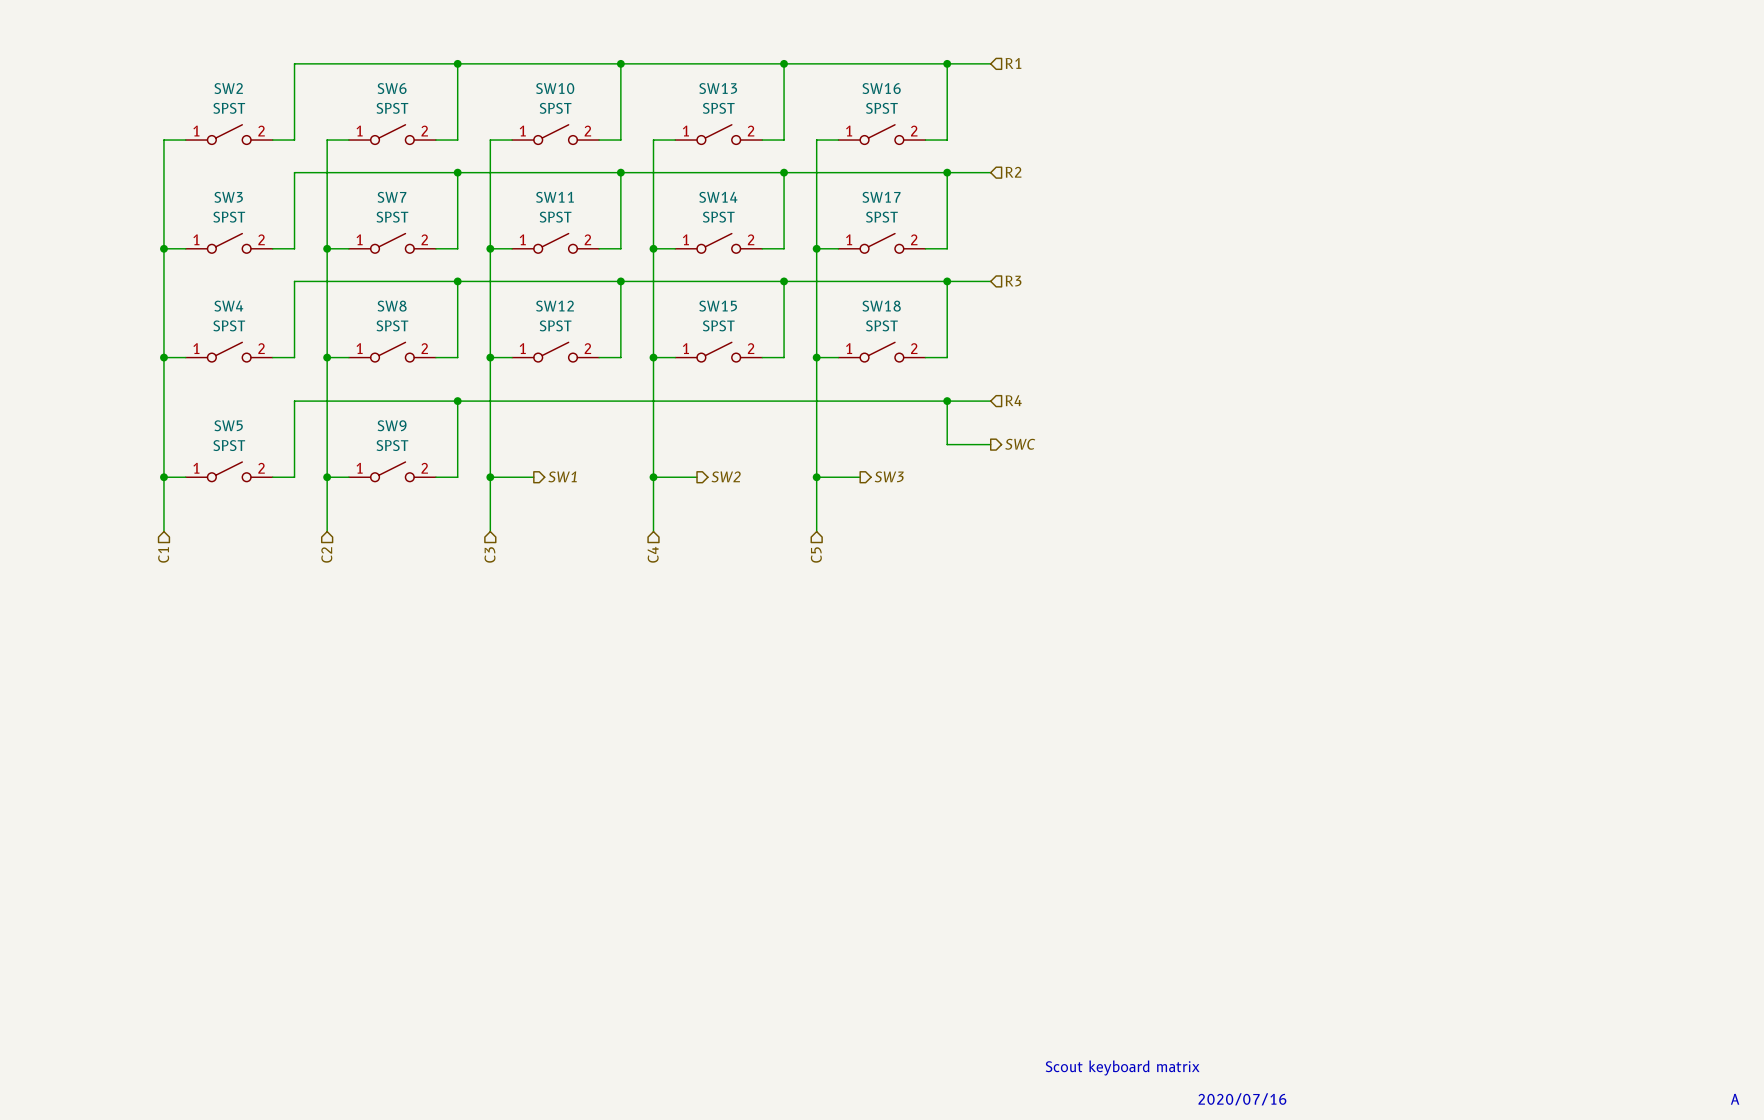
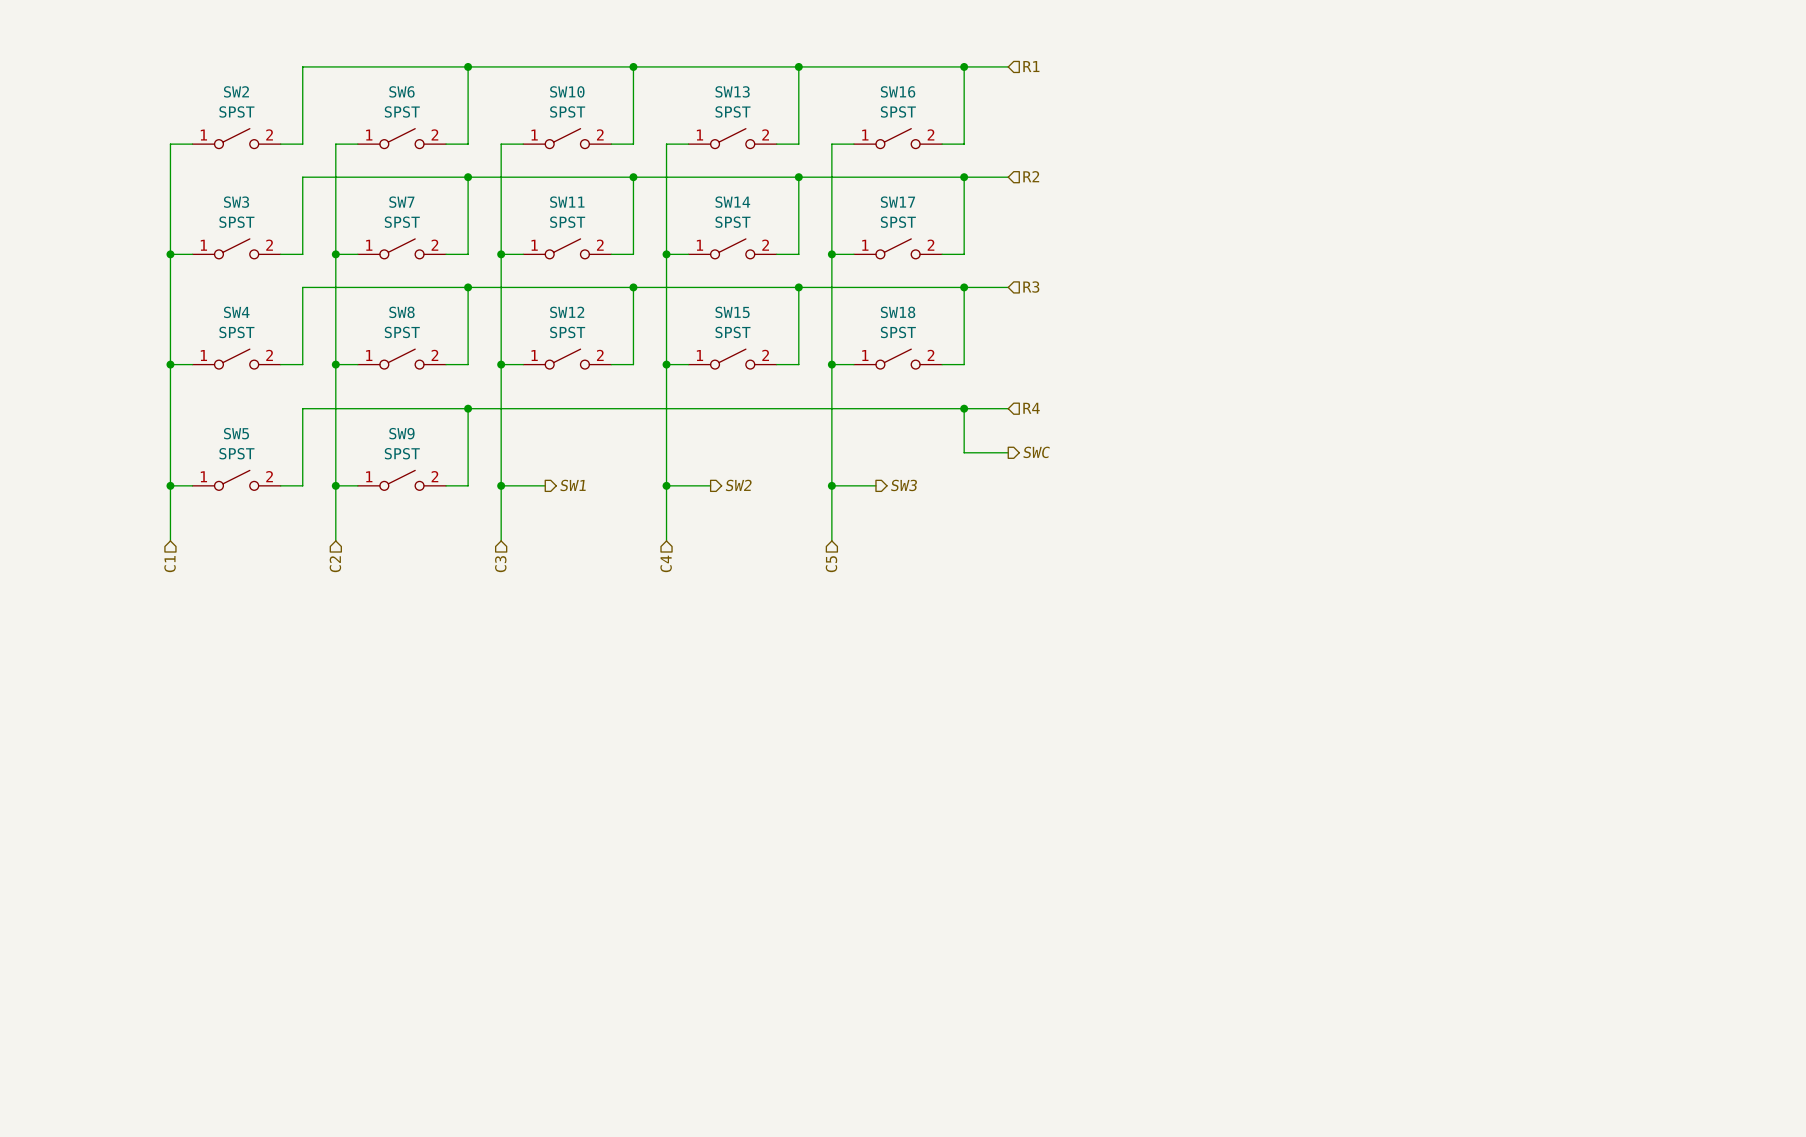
text: Scout keyboard matrix (1122, 1067) -> none
text: 2020/07/16 (1242, 1099) -> none
text: A (1735, 1099) -> none

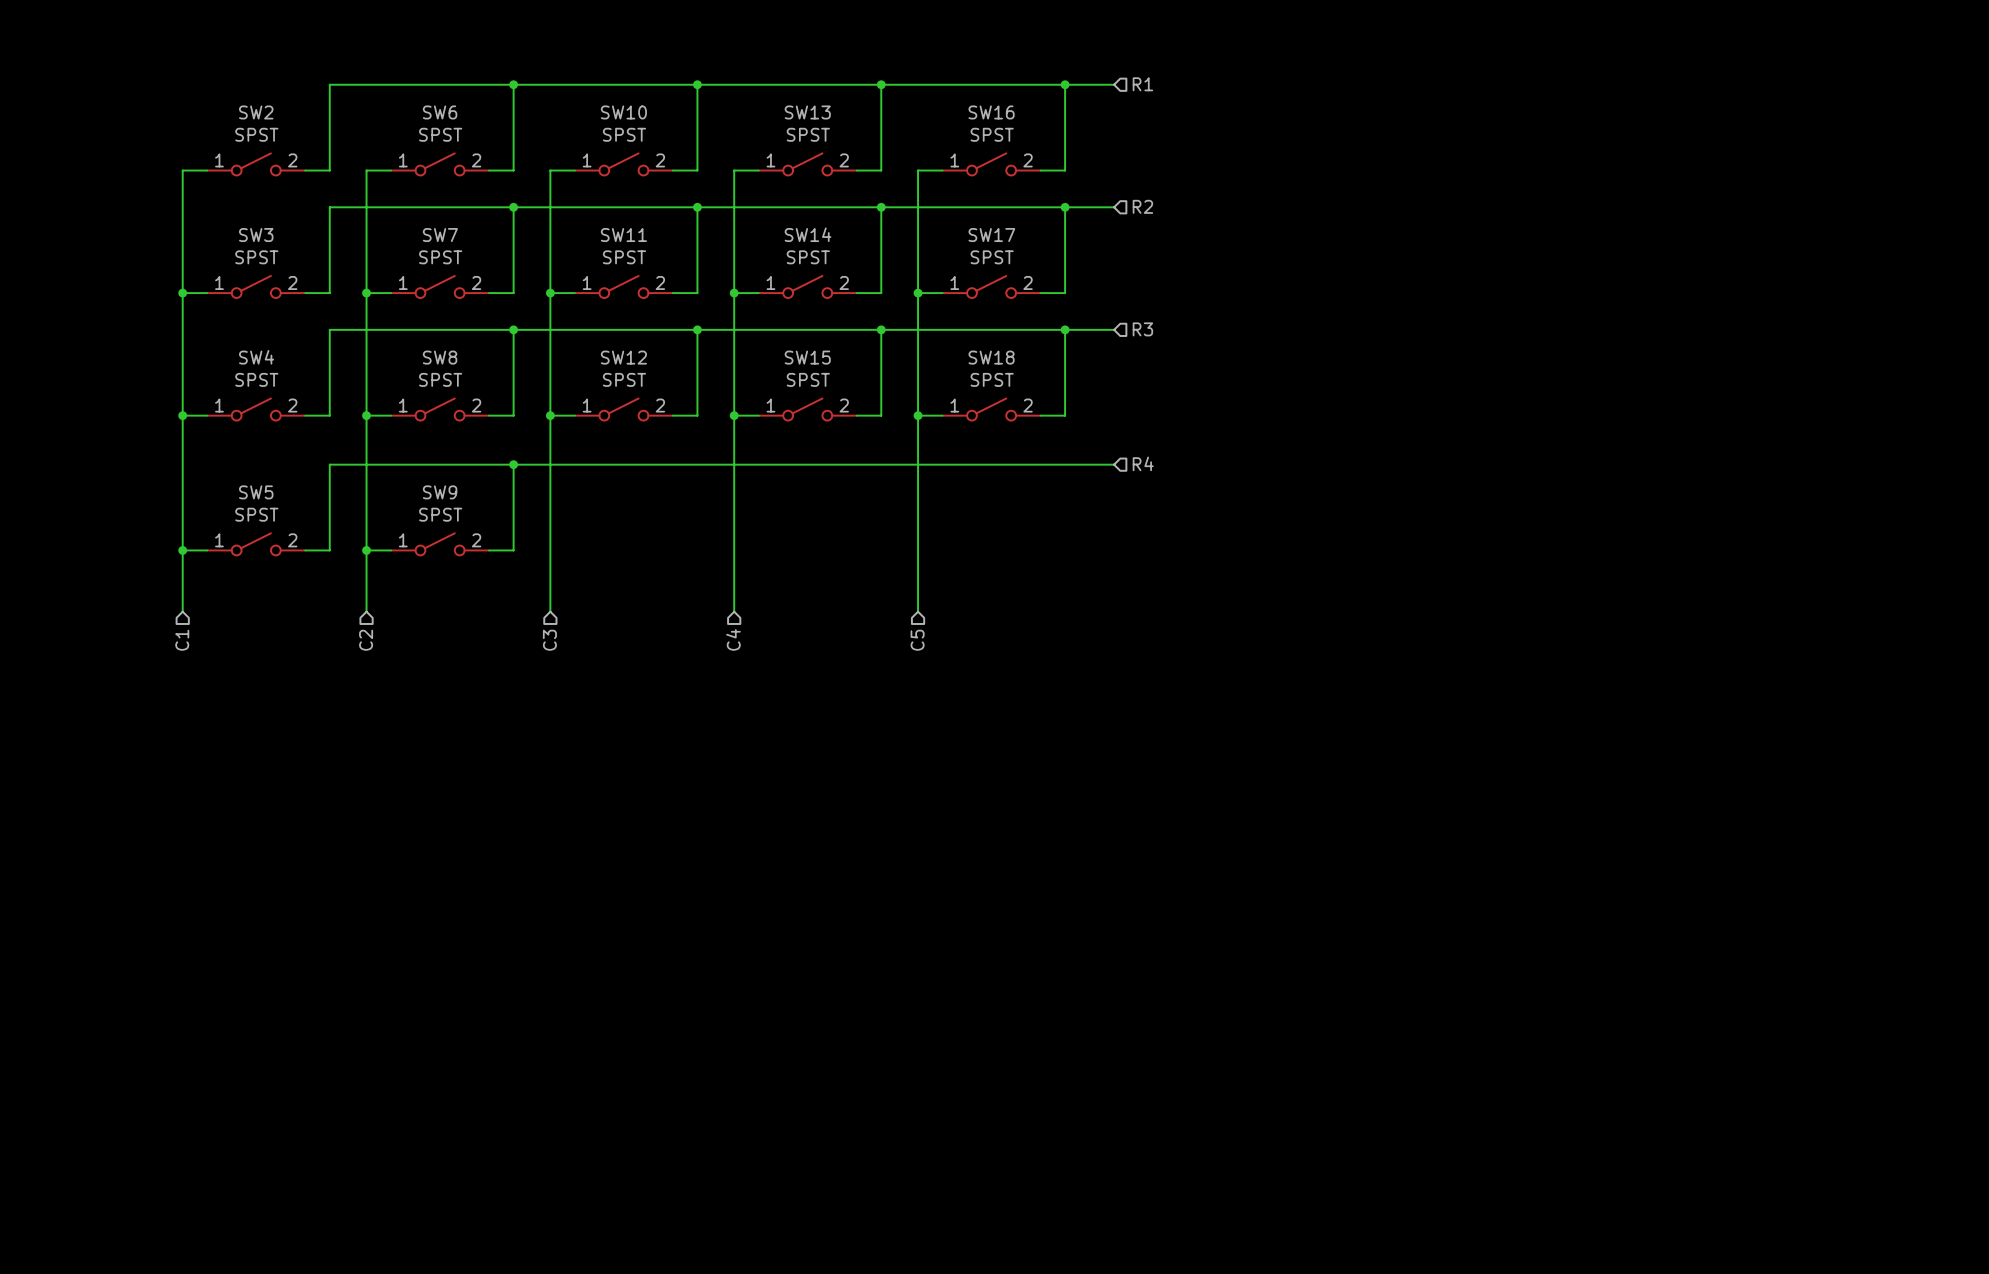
wire: (964, 408) (964, 452) (1008, 452) -> none
junction: (964, 408) -> none
hierarchical label: SWC (1036, 452) -> none
wire: (501, 485) (545, 485) -> none
junction: (501, 485) -> none
hierarchical label: SW1 (573, 485) -> none
wire: (666, 485) (710, 485) -> none
junction: (666, 485) -> none
hierarchical label: SW2 (738, 485) -> none
wire: (831, 485) (875, 485) -> none
junction: (831, 485) -> none
hierarchical label: SW3 (904, 485) -> none

